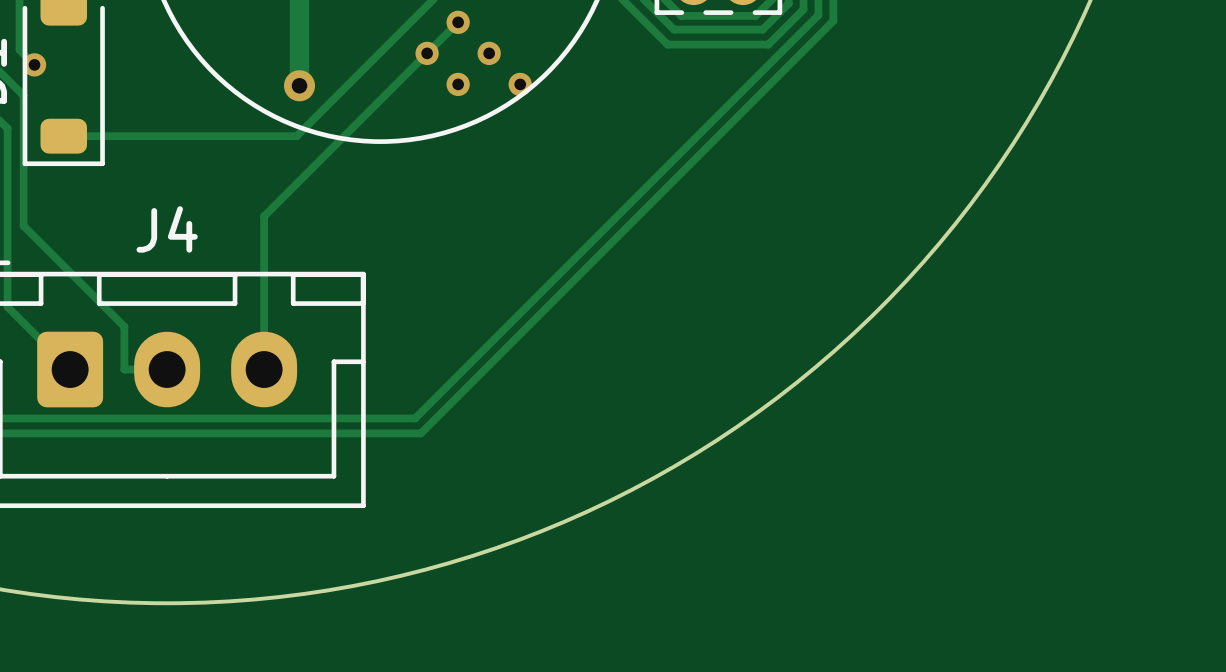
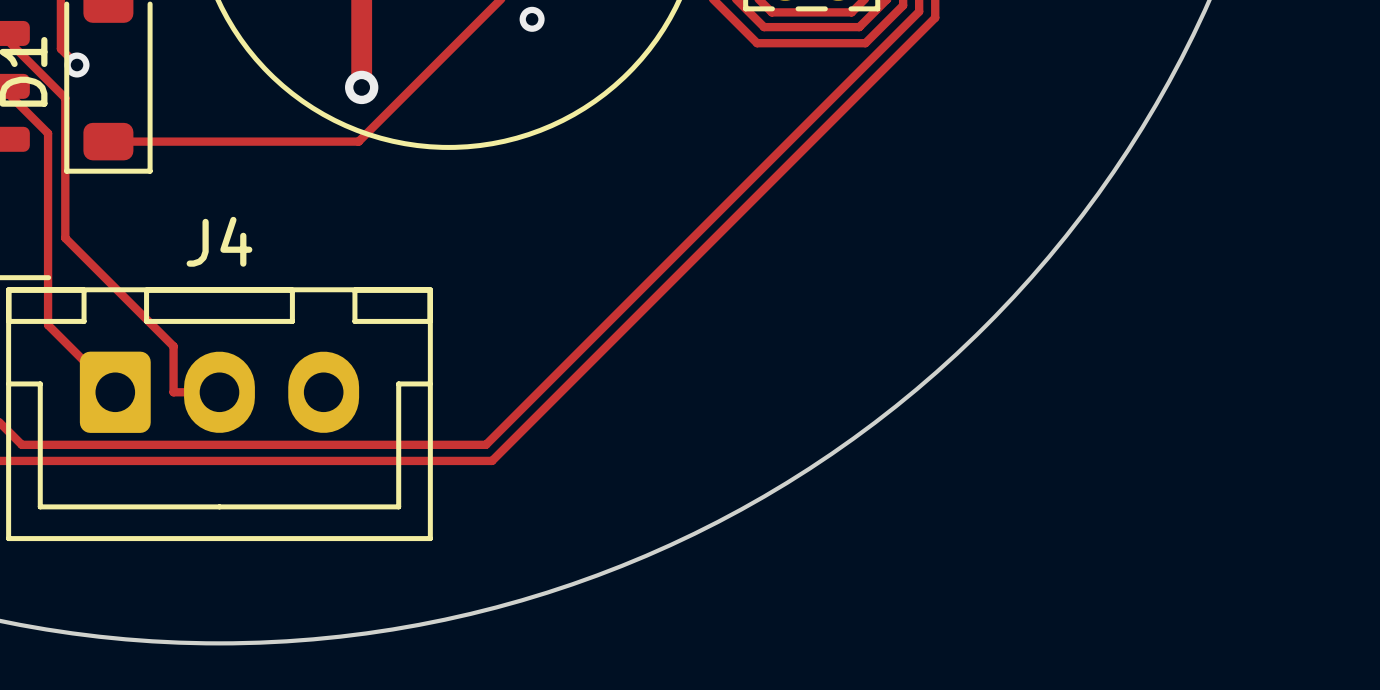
track: (458, 22) (264, 216) (264, 369) -> none
via: (427, 53) -> none
via: (489, 53) -> none
via: (458, 84) -> none
via: (520, 84) -> none

